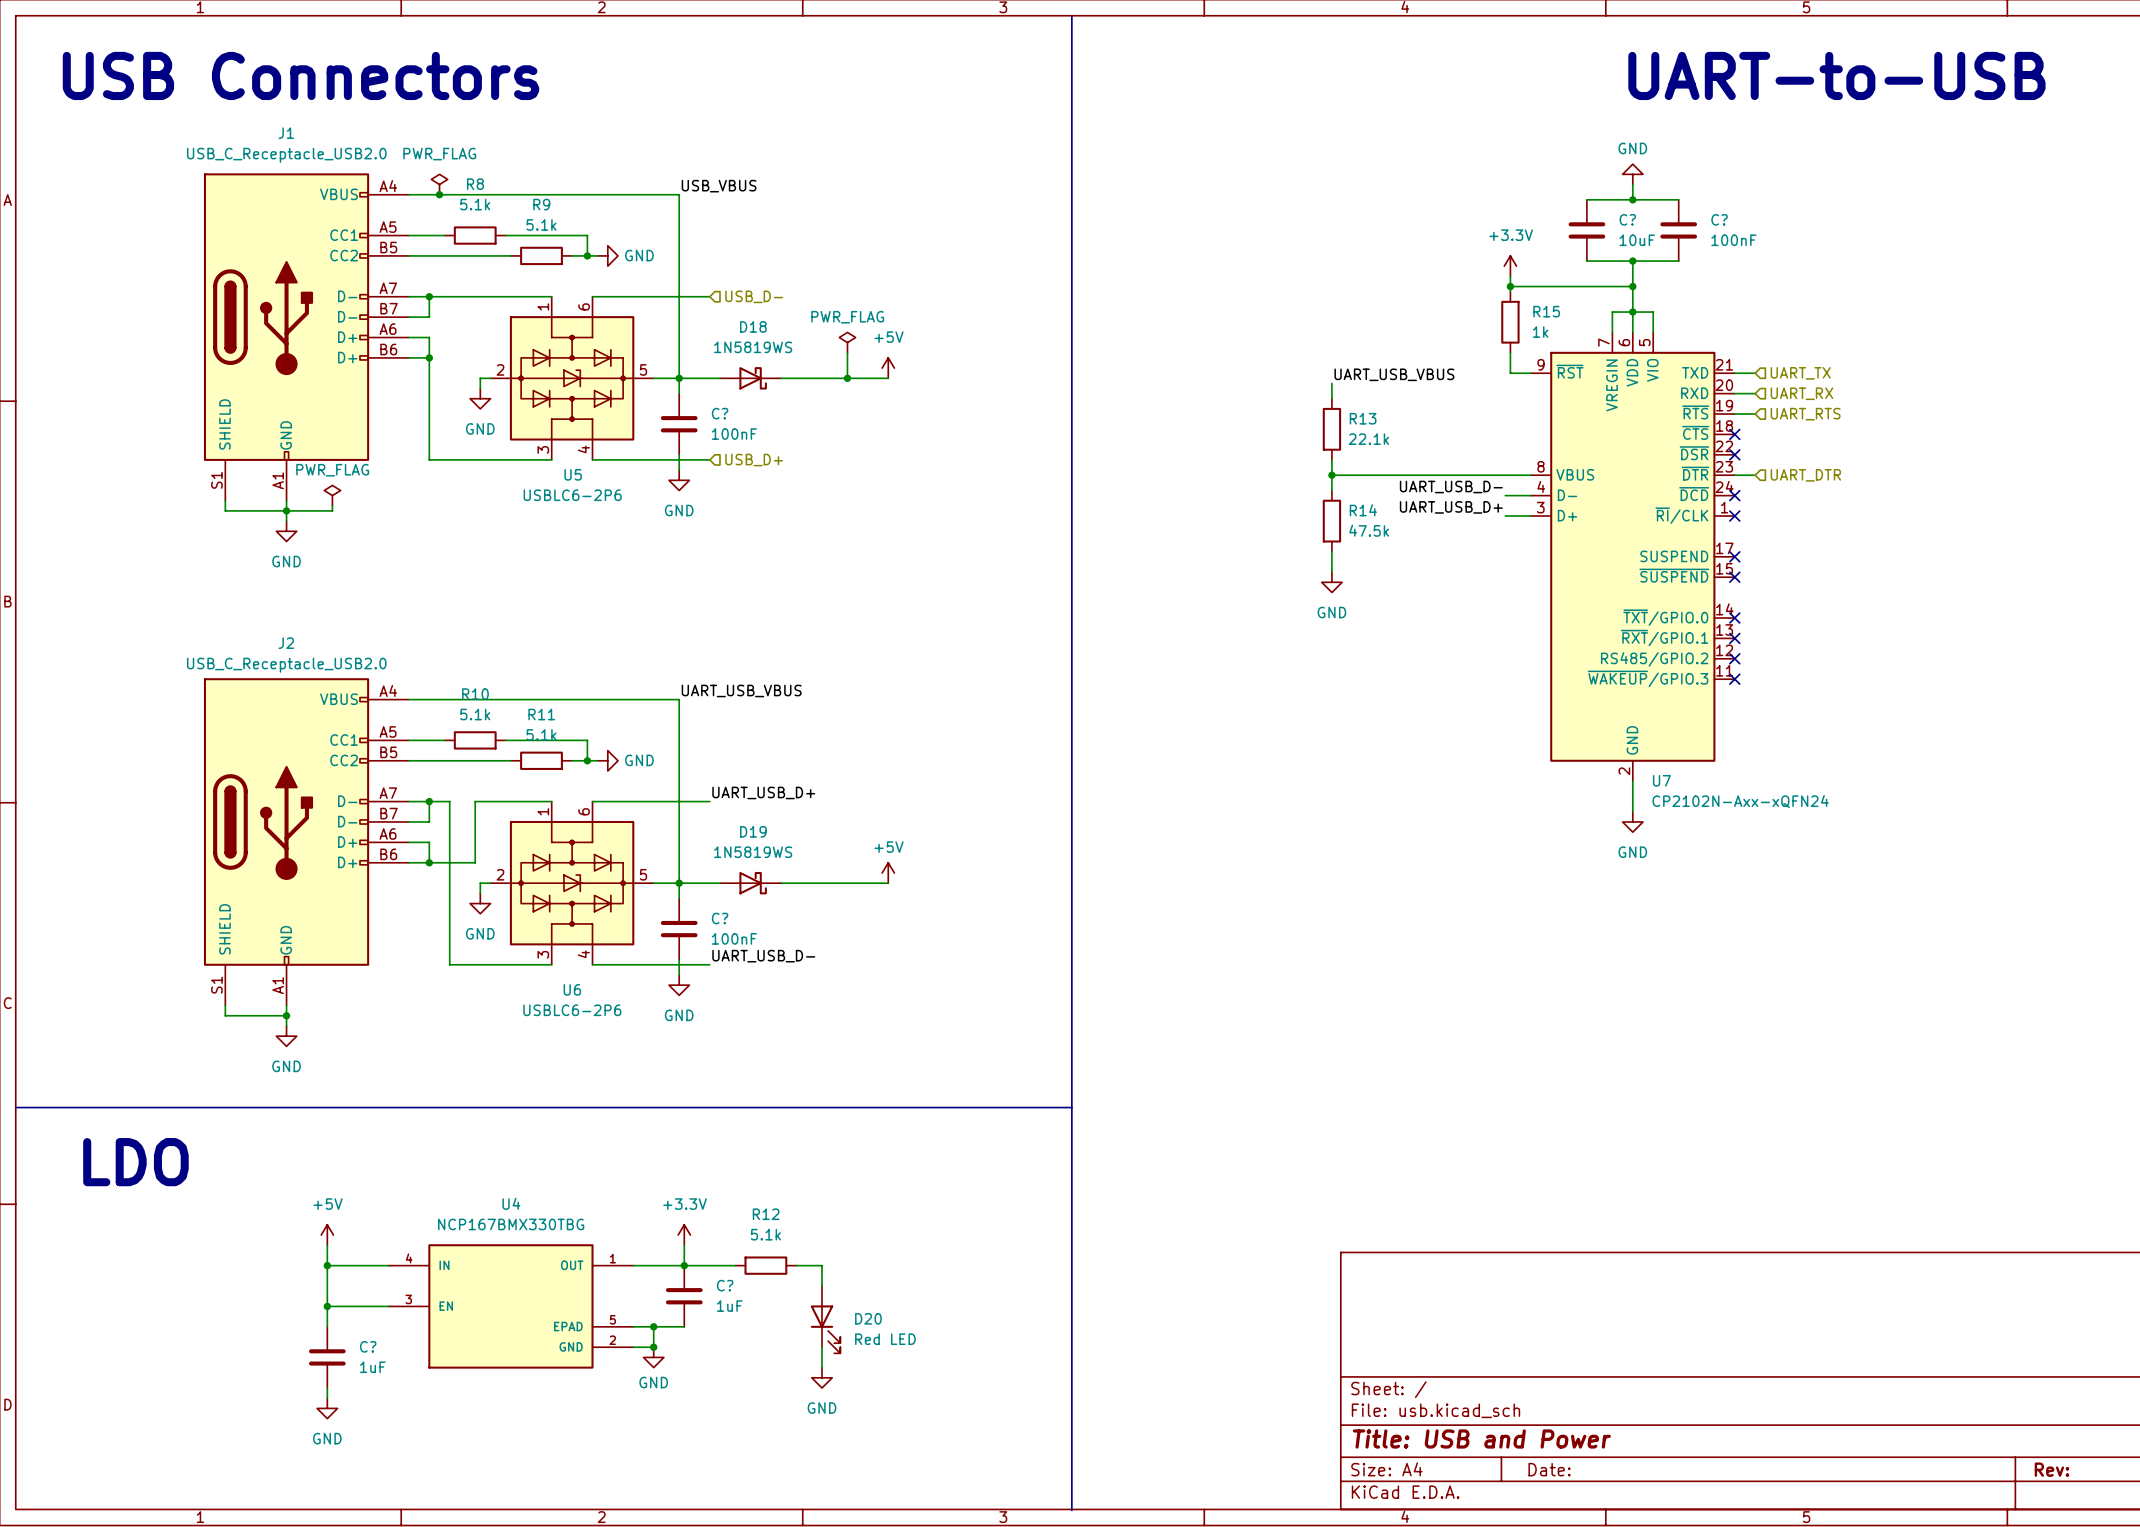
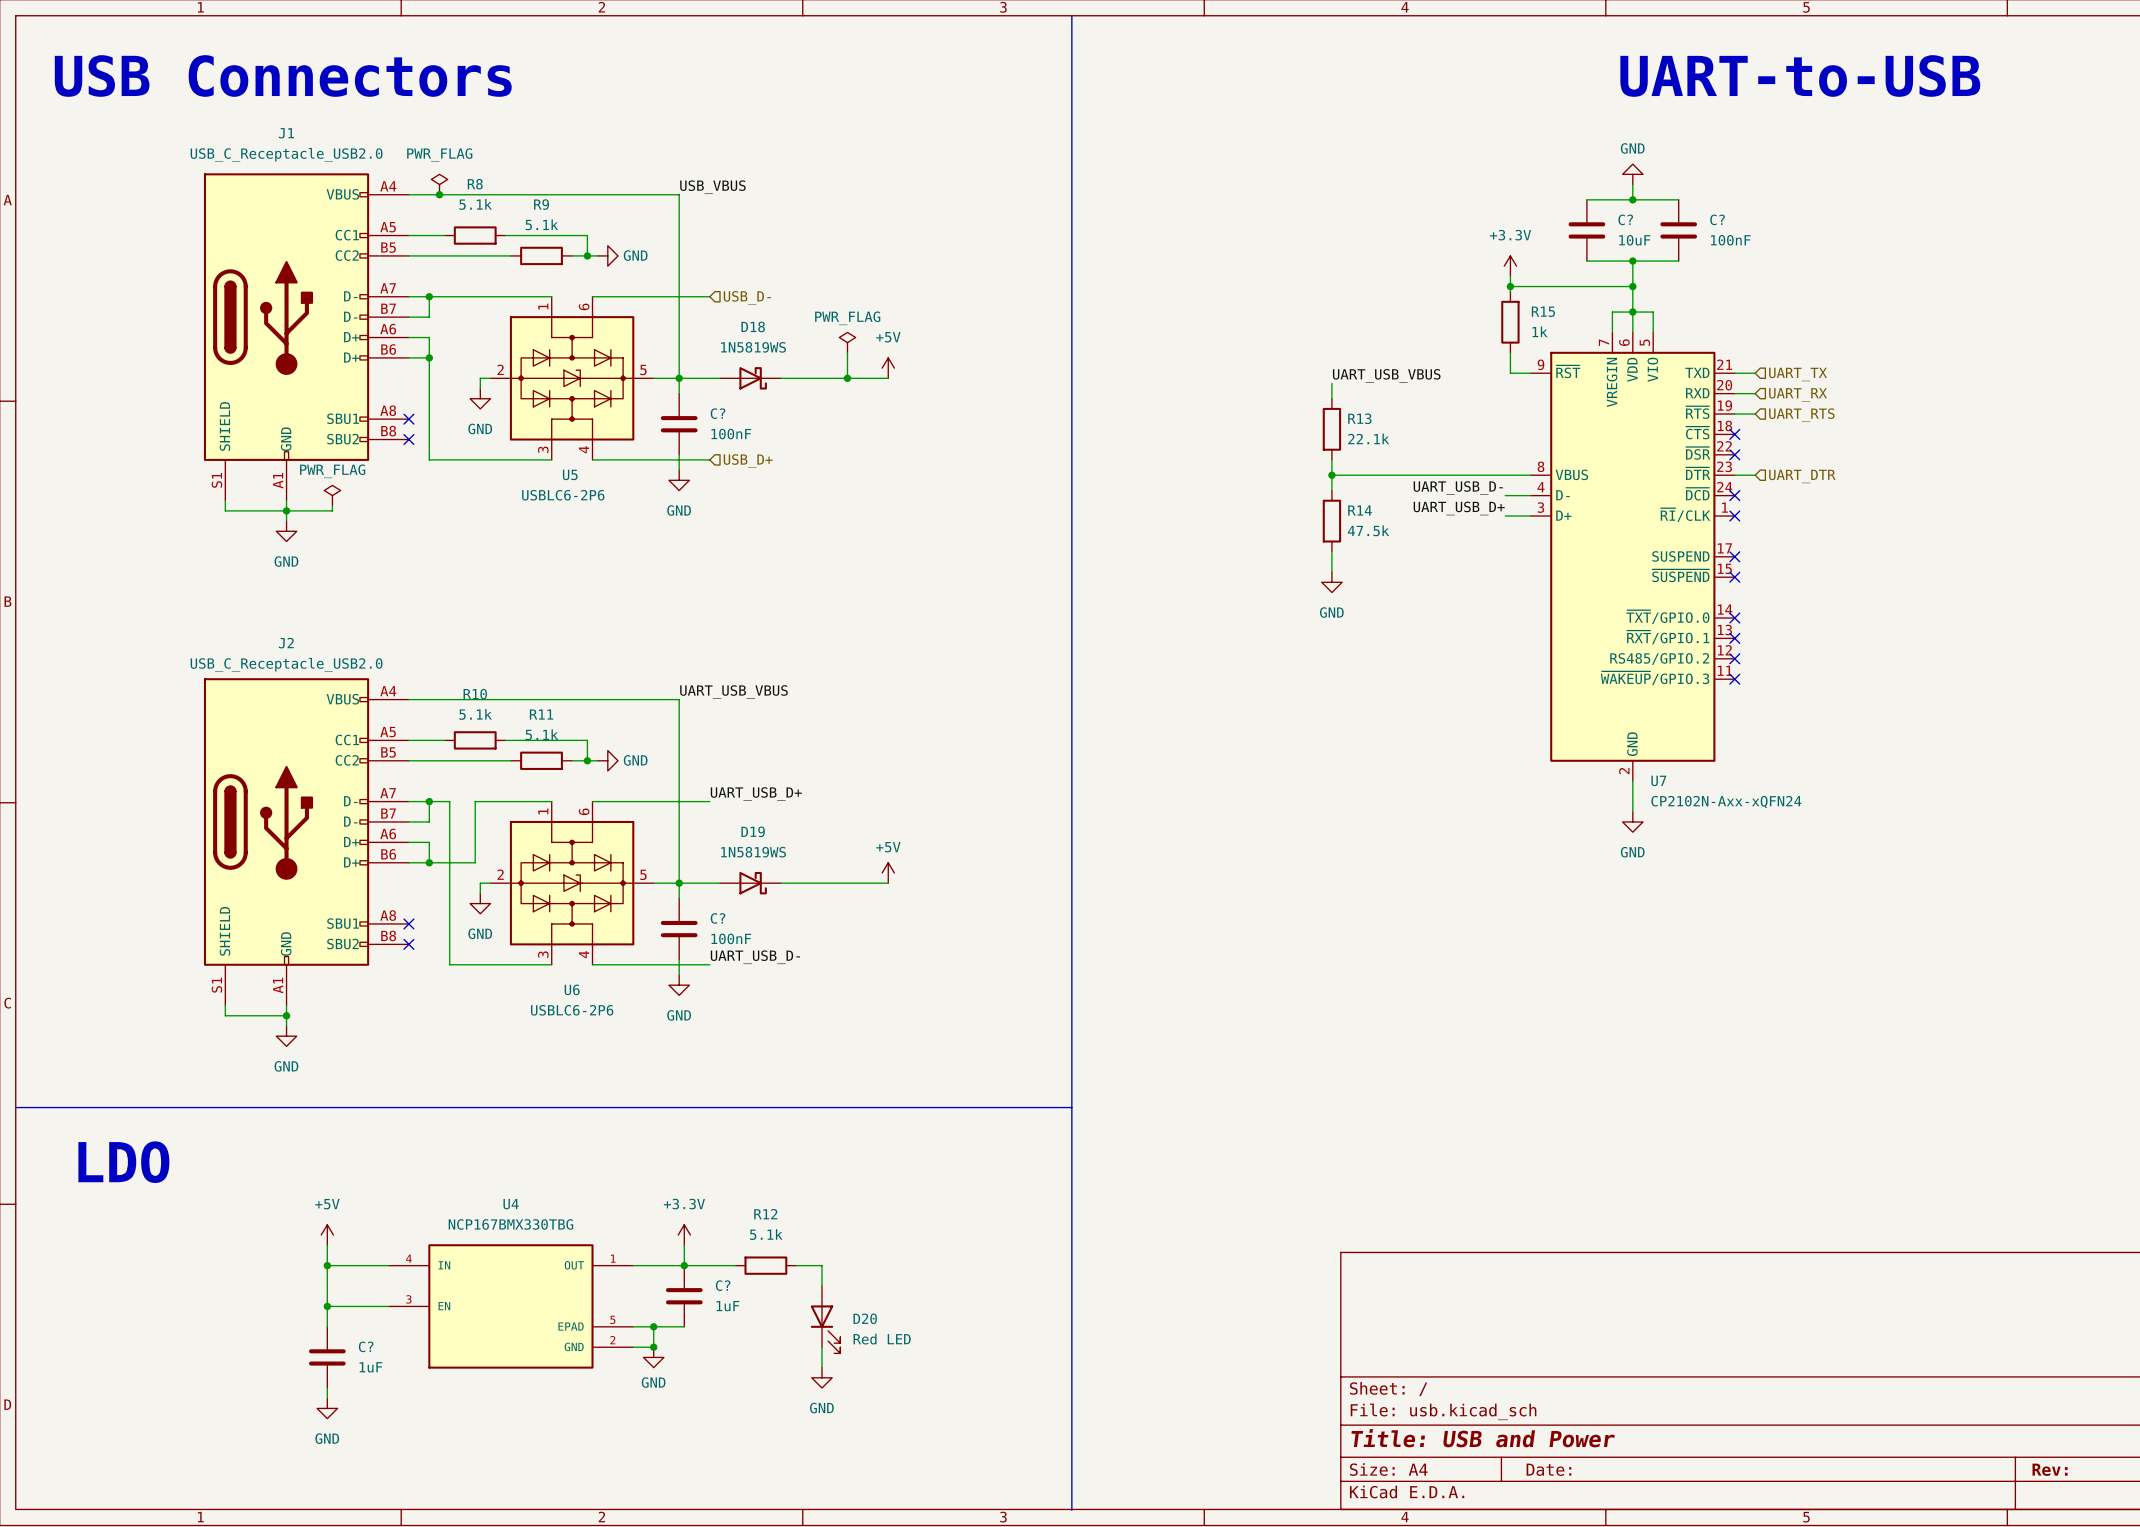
J1 symbol: [203, 173, 409, 501] -> [203, 173, 409, 501]
no-connect mark: none -> (408, 419)
no-connect mark: none -> (408, 439)
J2 symbol: [203, 678, 409, 1006] -> [203, 678, 409, 1006]
no-connect mark: none -> (408, 923)
no-connect mark: none -> (408, 944)

